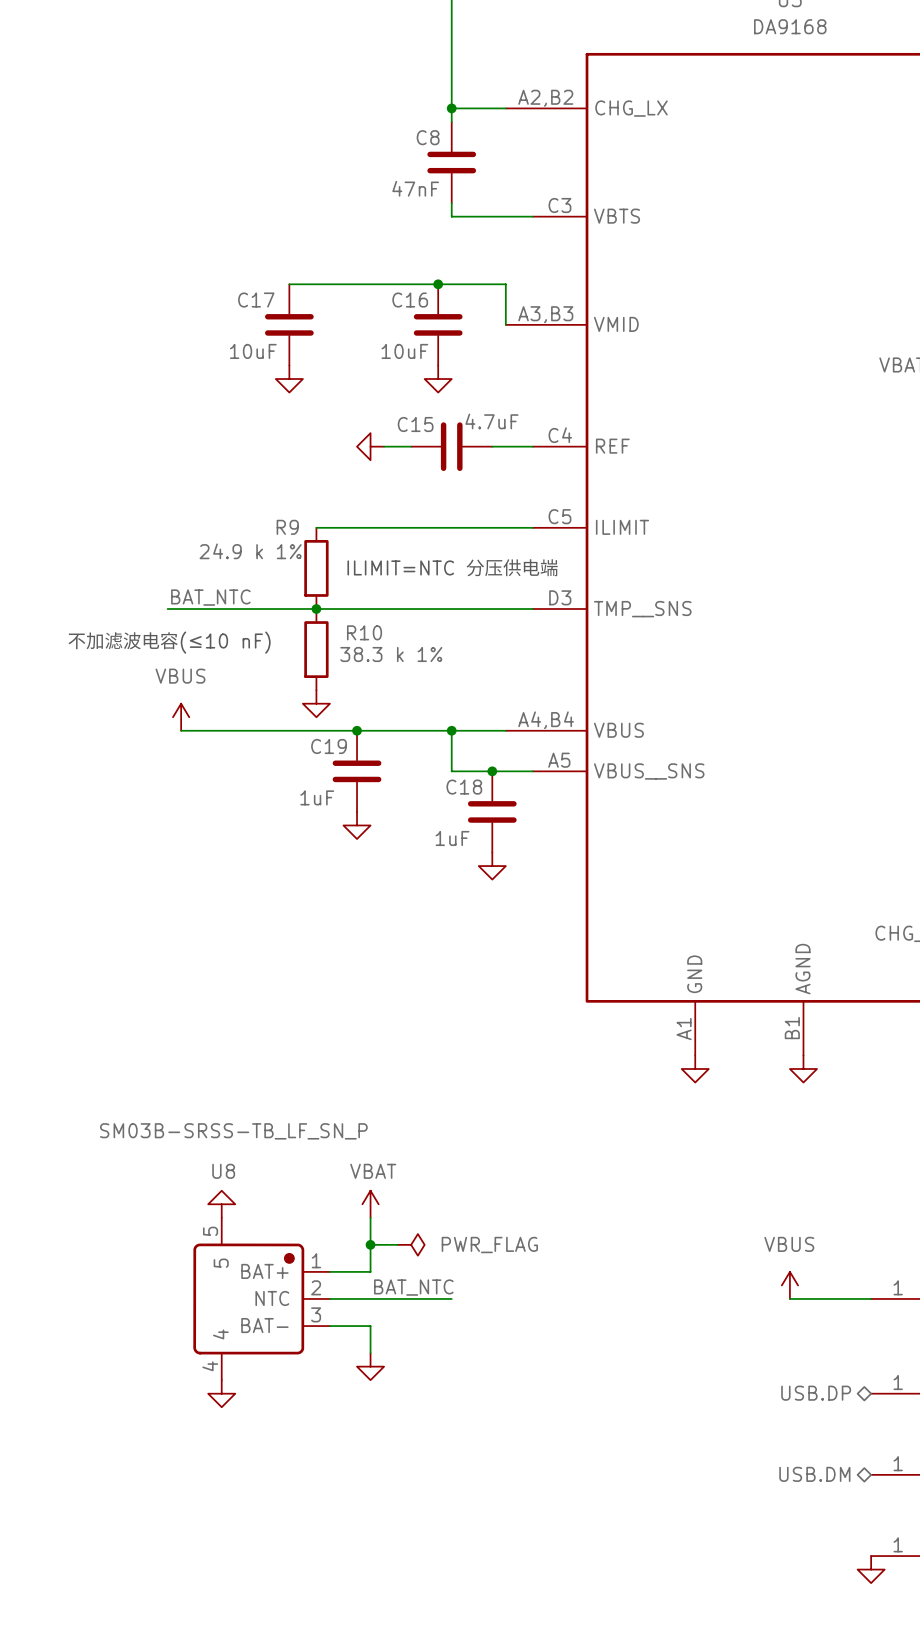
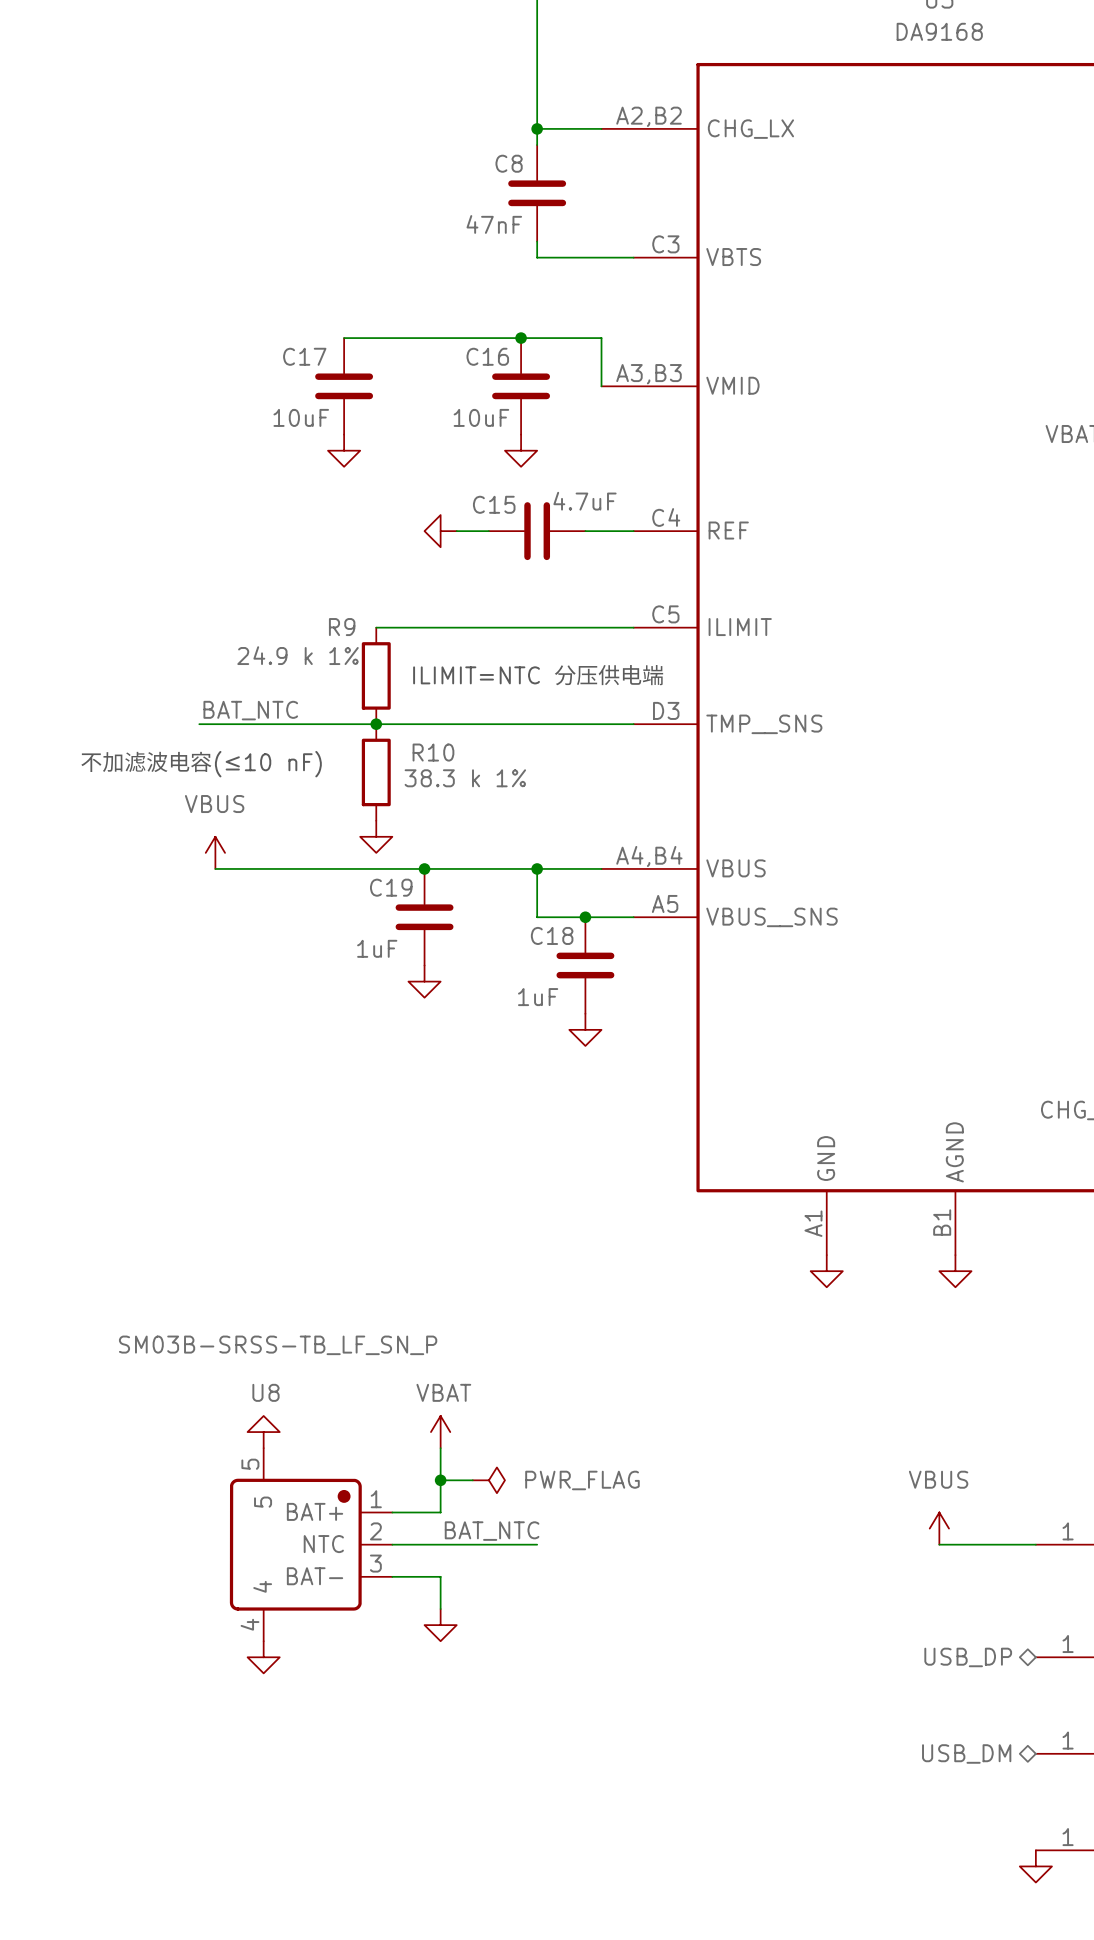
hierarchical label: USB.DP (816, 1393) -> USB_DP (968, 1657)
hierarchical label: USB.DM (814, 1474) -> USB_DM (966, 1753)

